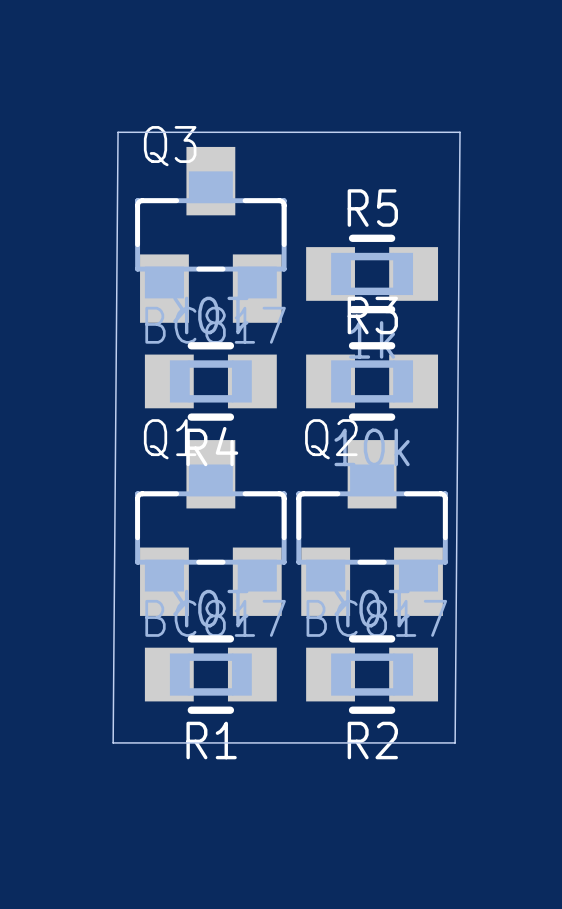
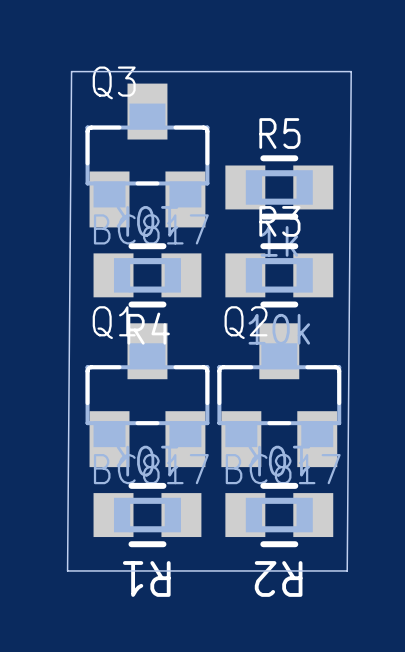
R1 name rotation: 0° (211, 740) -> 180° (146, 578)
R2 name rotation: 0° (372, 740) -> 180° (278, 578)

